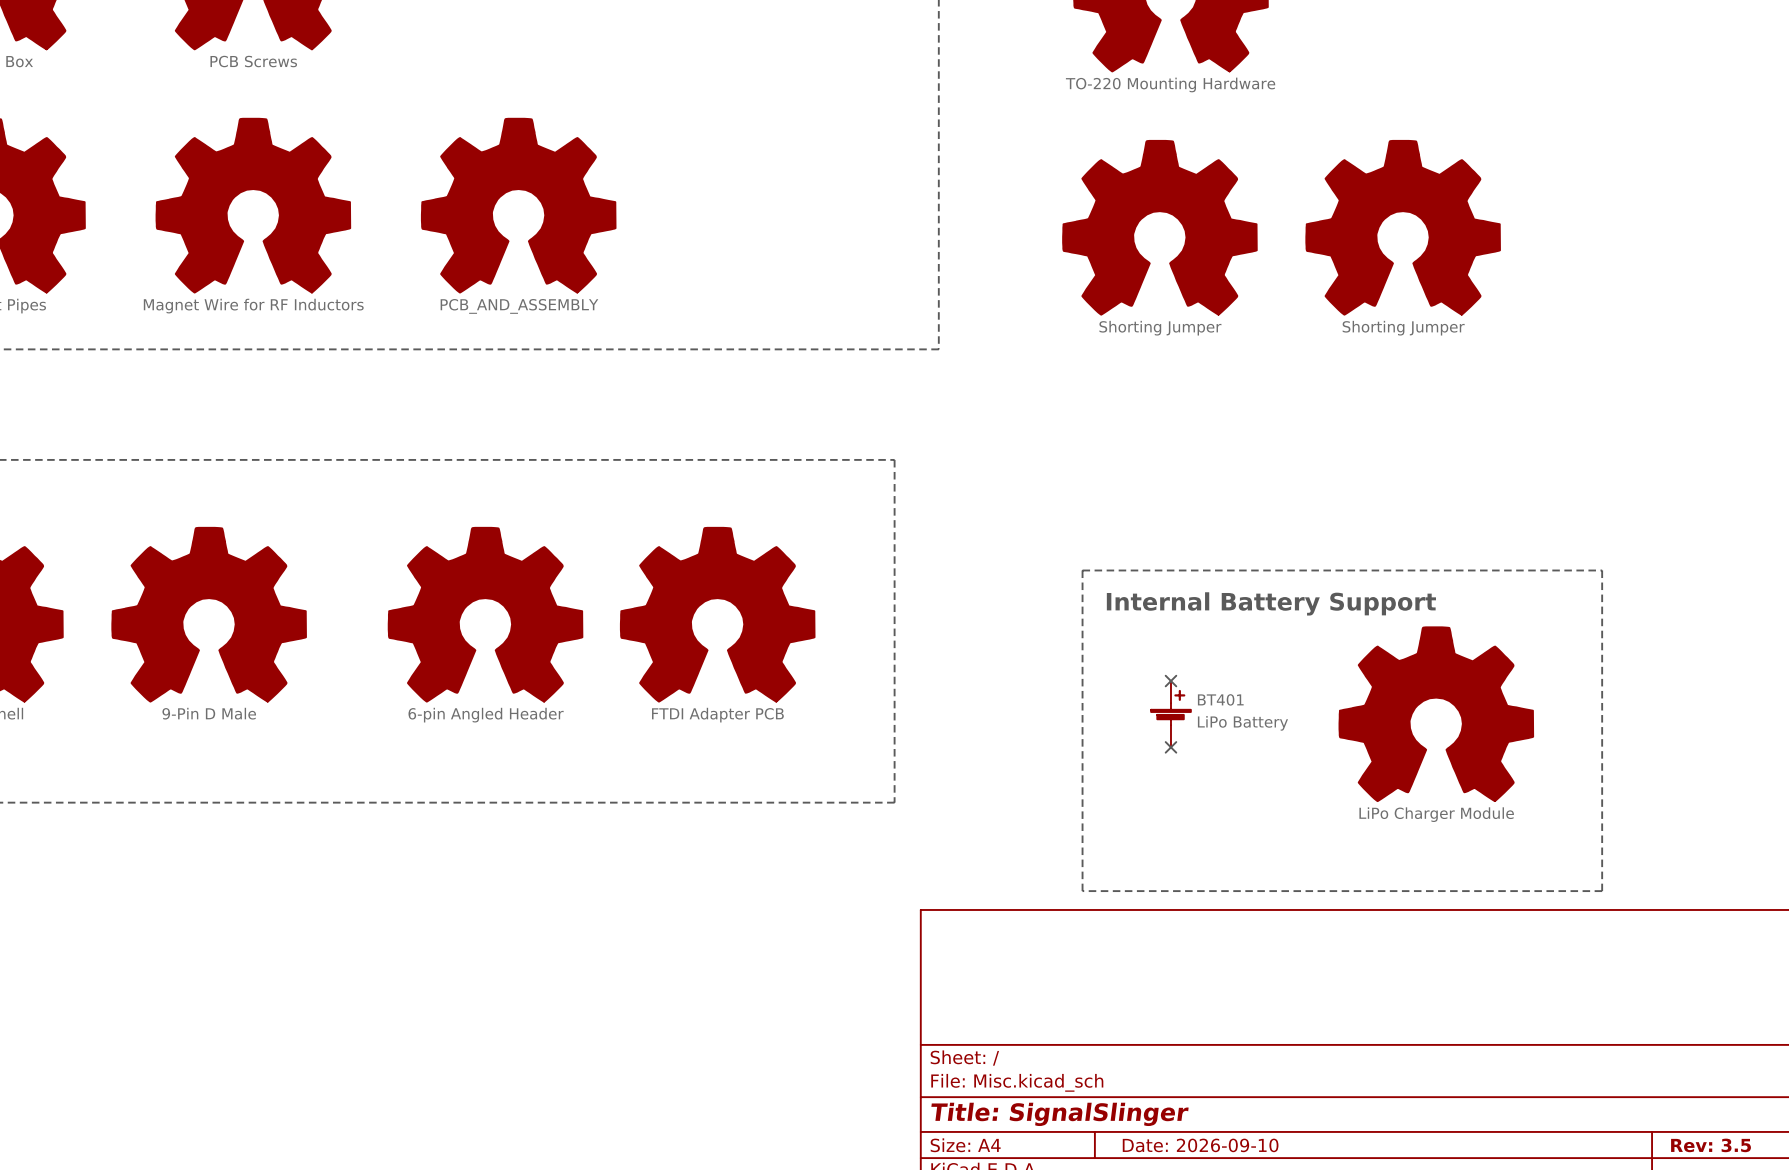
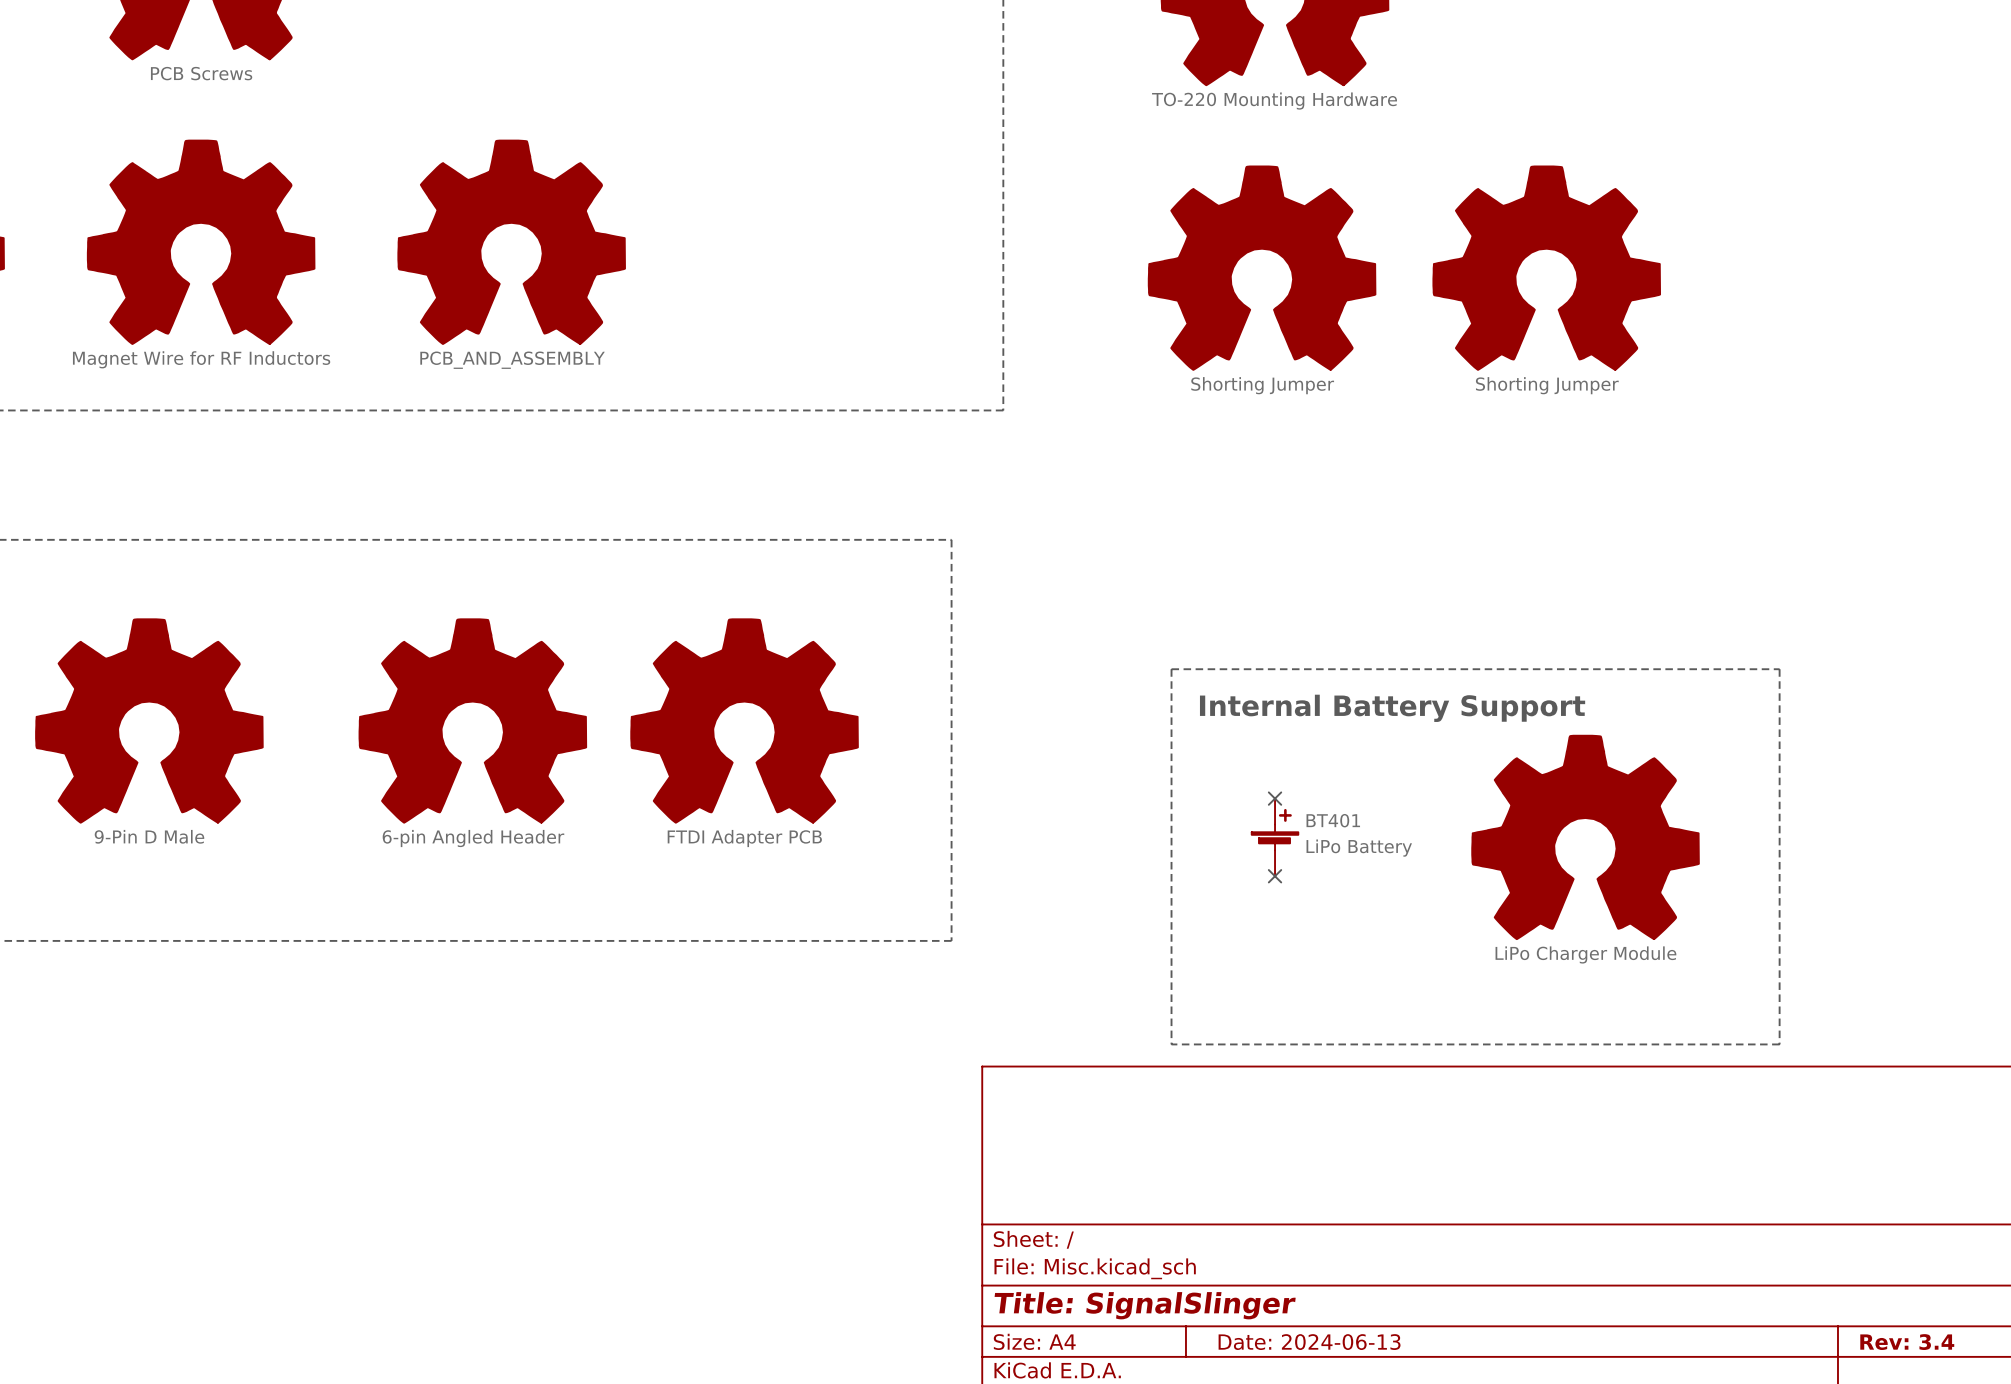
title block: Date: 2026-09-10 (1200, 1145) -> Date: 2024-06-13 (1309, 1342)
title block: Rev: 3.5 (1711, 1145) -> Rev: 3.4 (1907, 1342)

